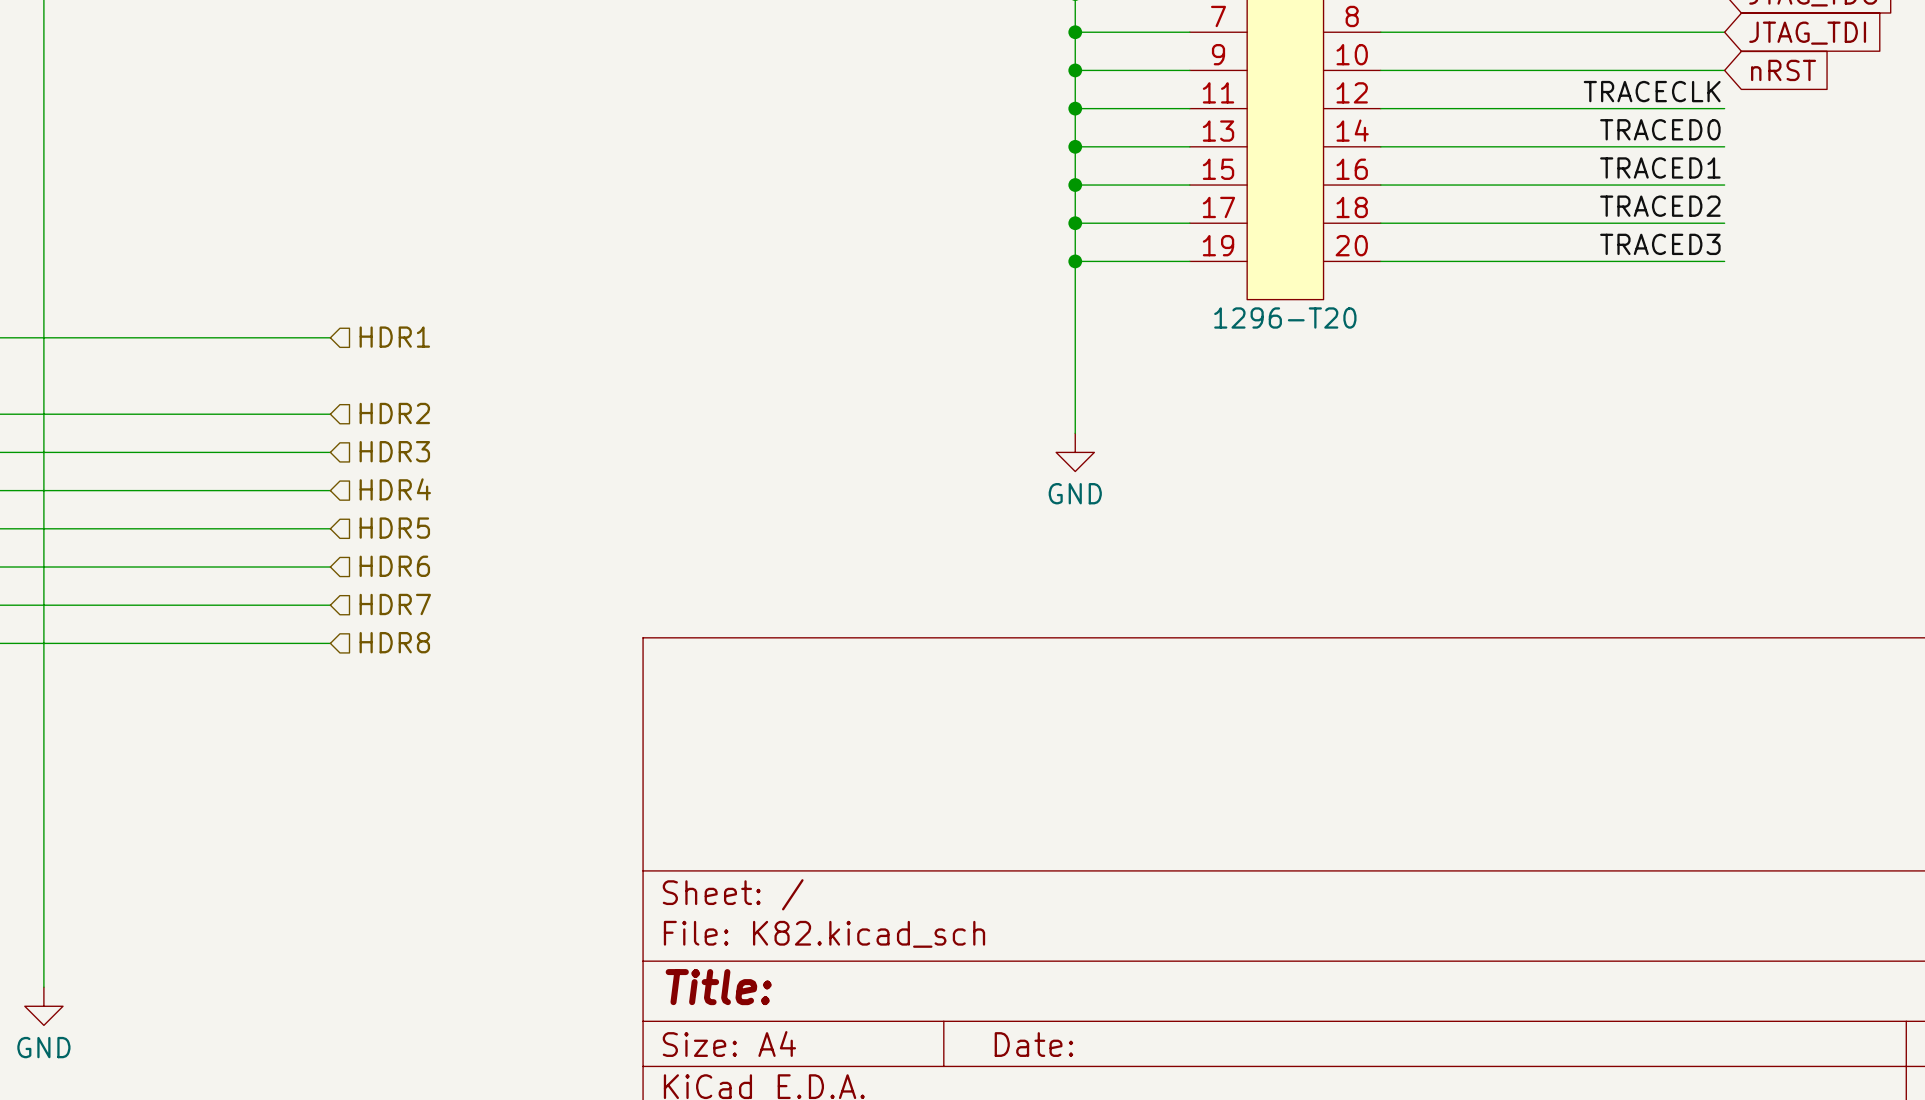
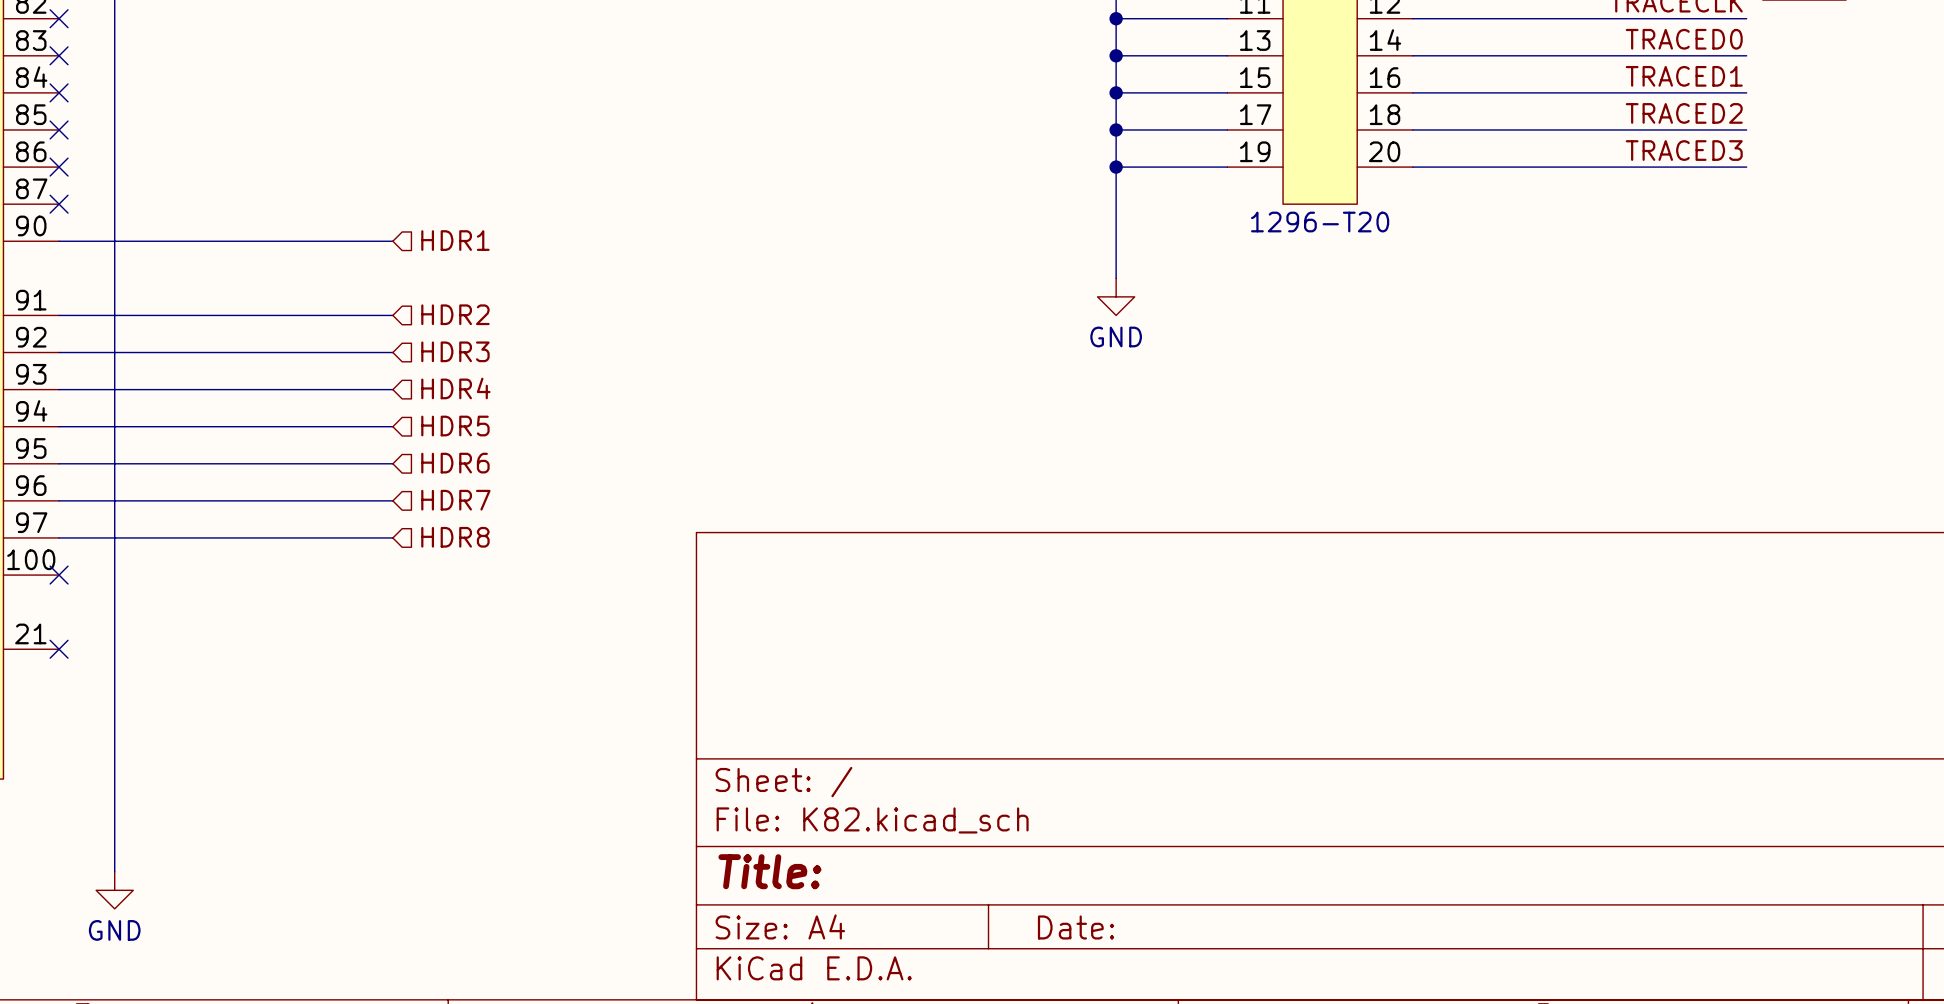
wire: (1075, 376) (1075, 433) -> none
power symbol position: GND (1075, 452) -> GND (1116, 296)

